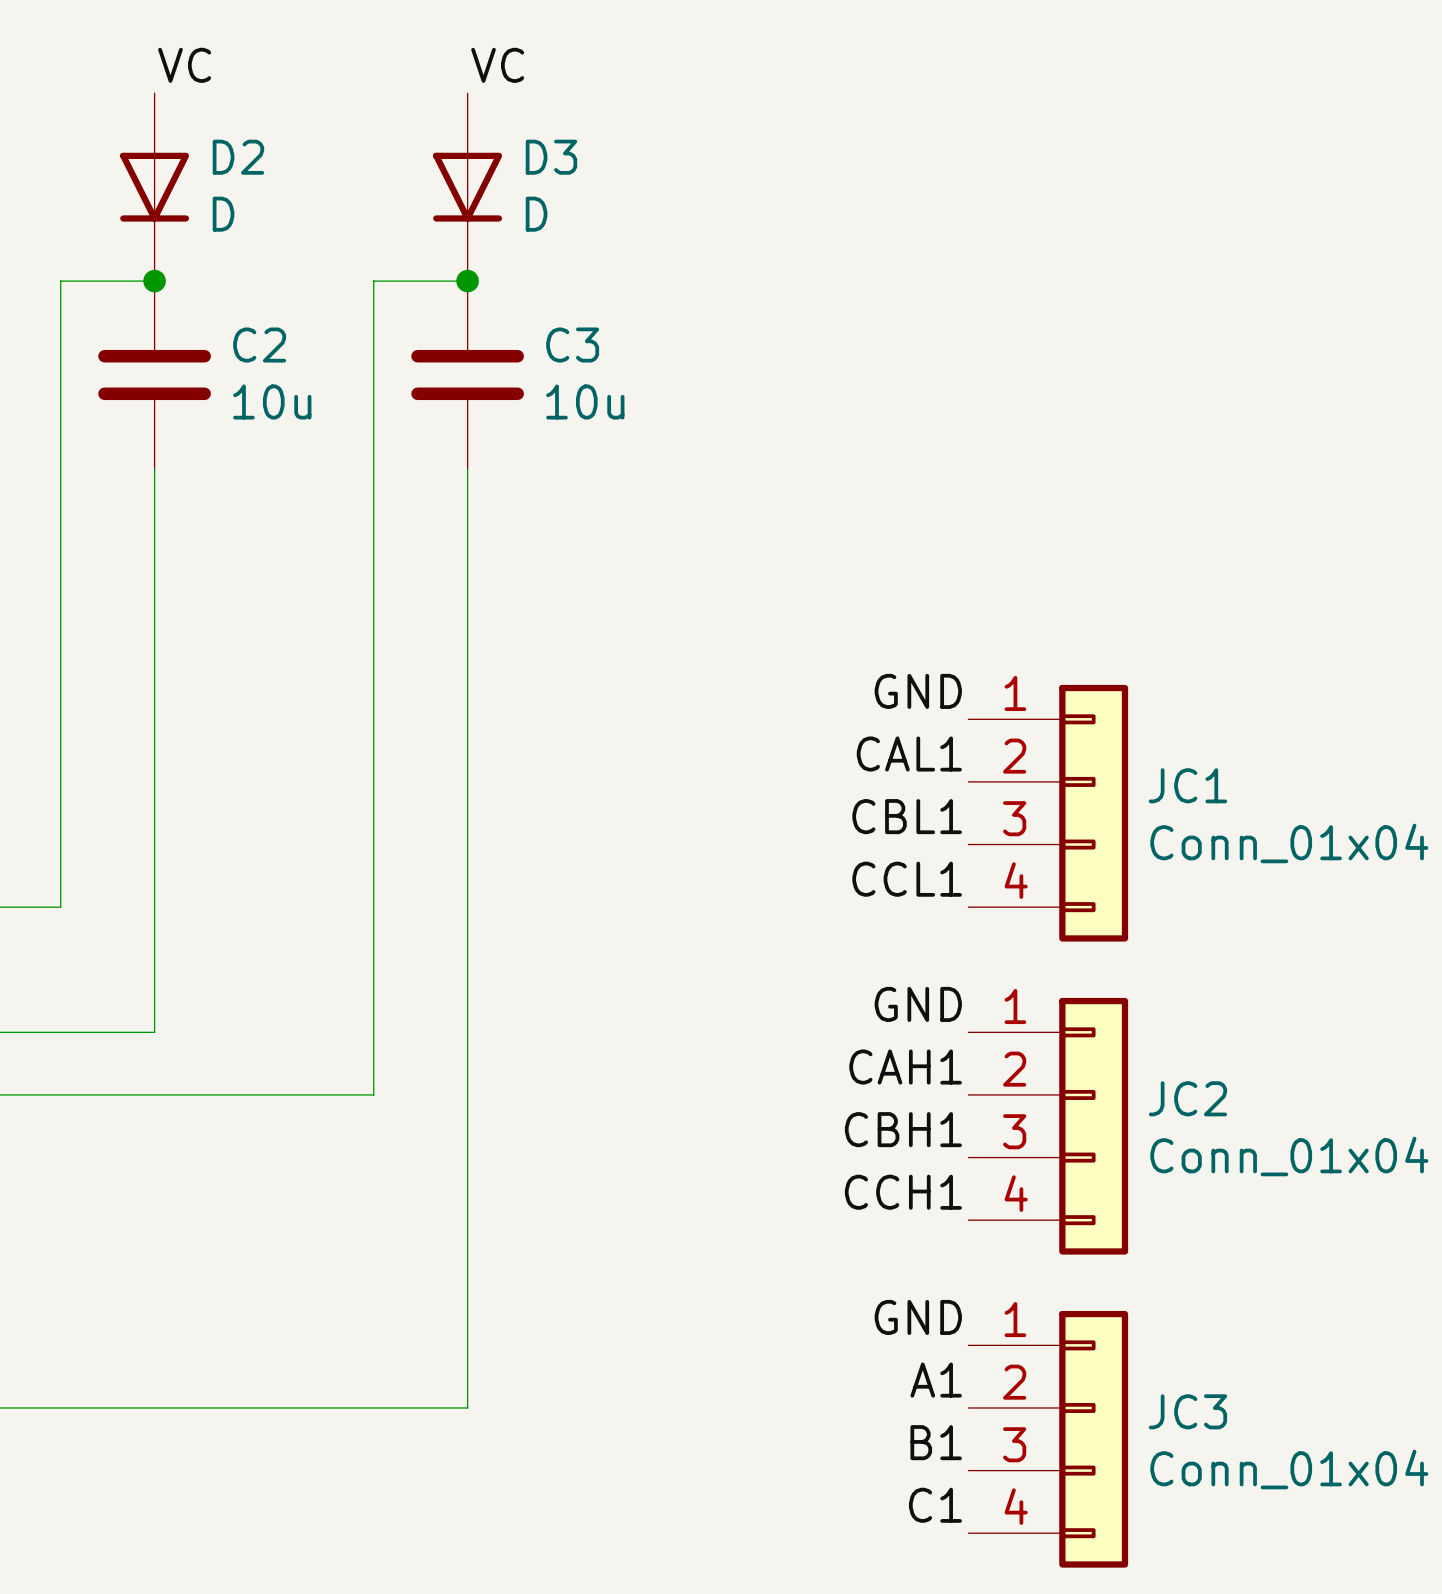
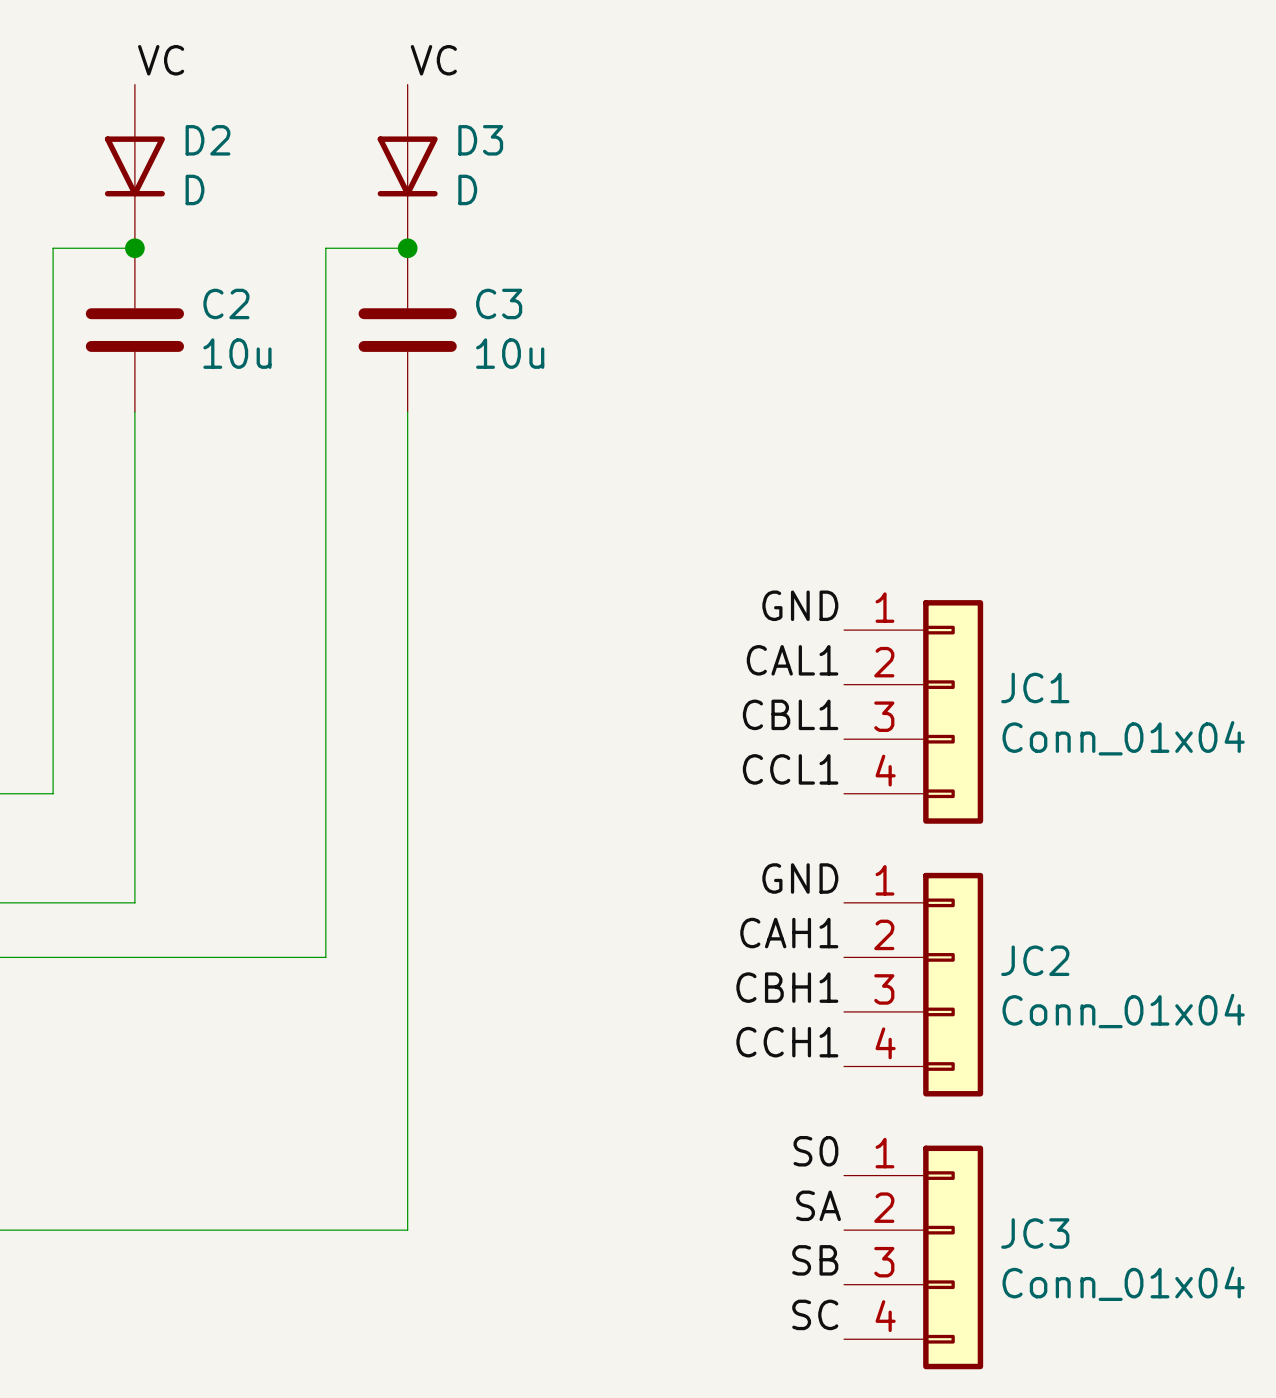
label: GND (918, 1317) -> S0 (815, 1151)
label: A1 (936, 1380) -> SA (818, 1205)
label: B1 (936, 1442) -> SB (815, 1260)
label: C1 (935, 1505) -> SC (815, 1314)

